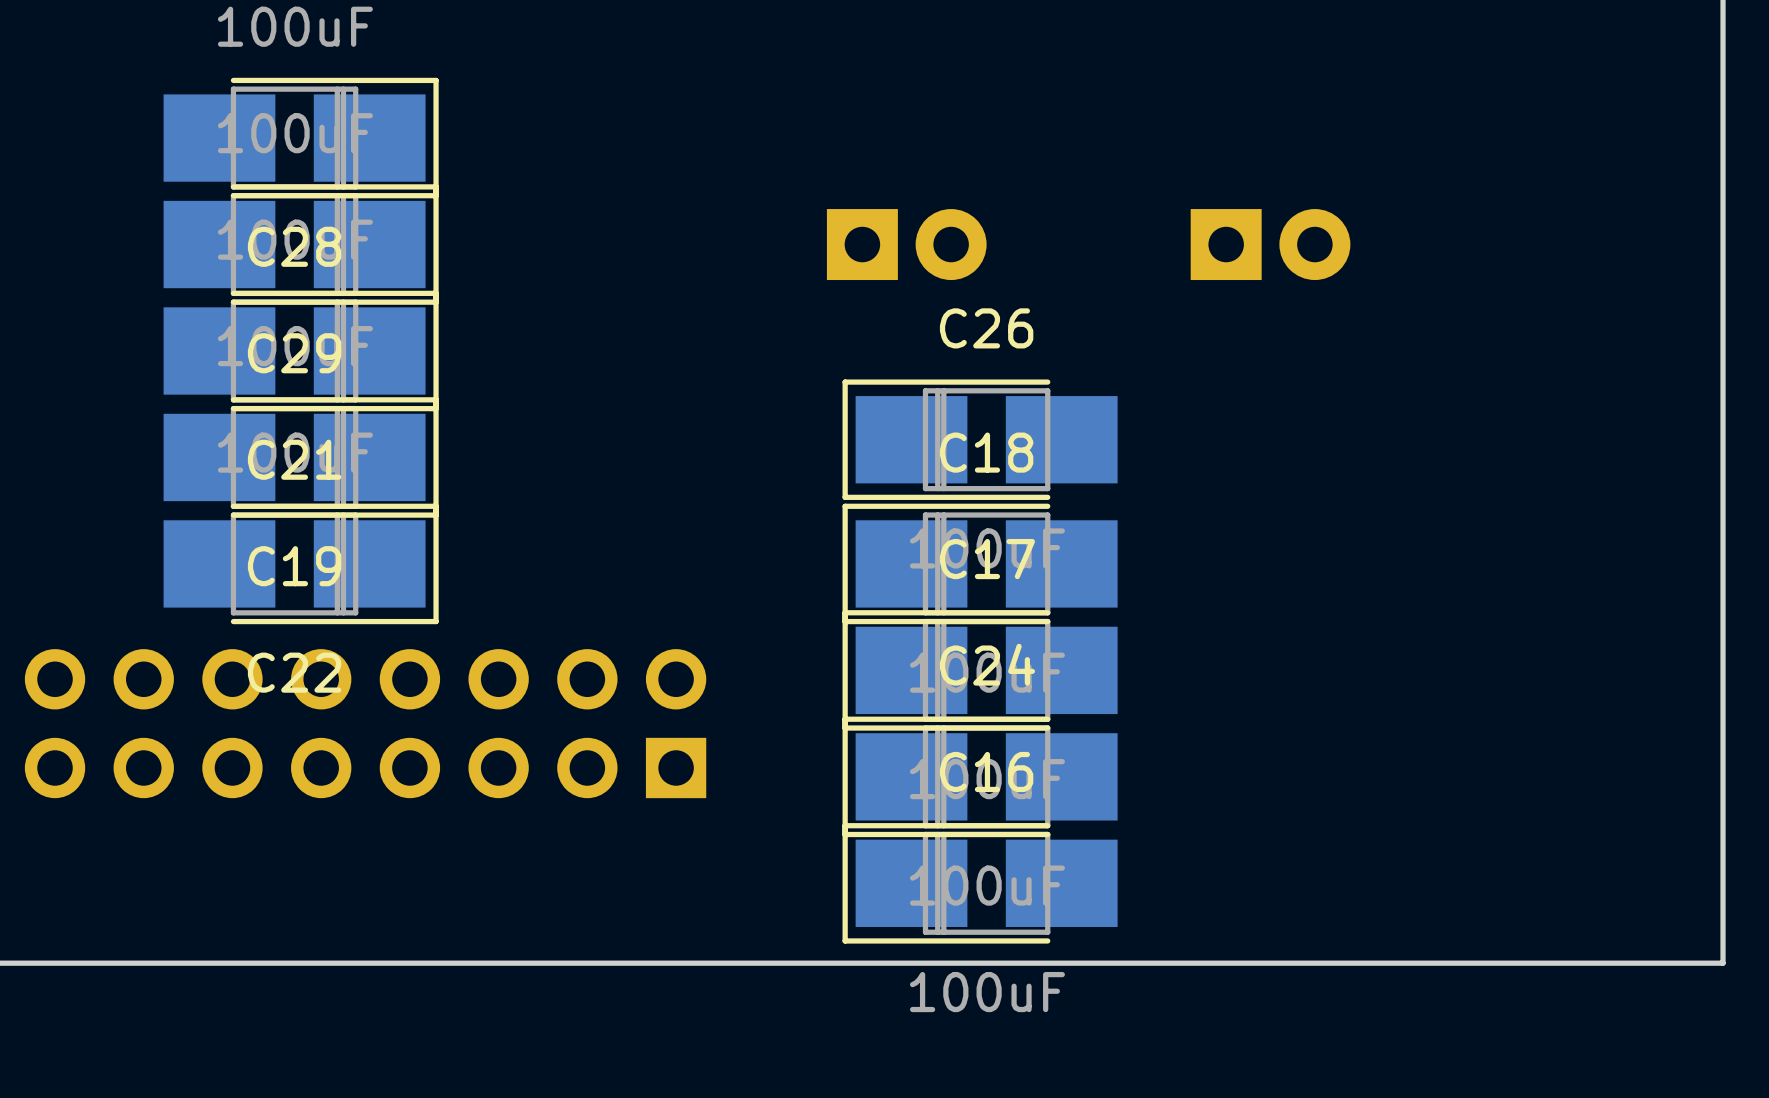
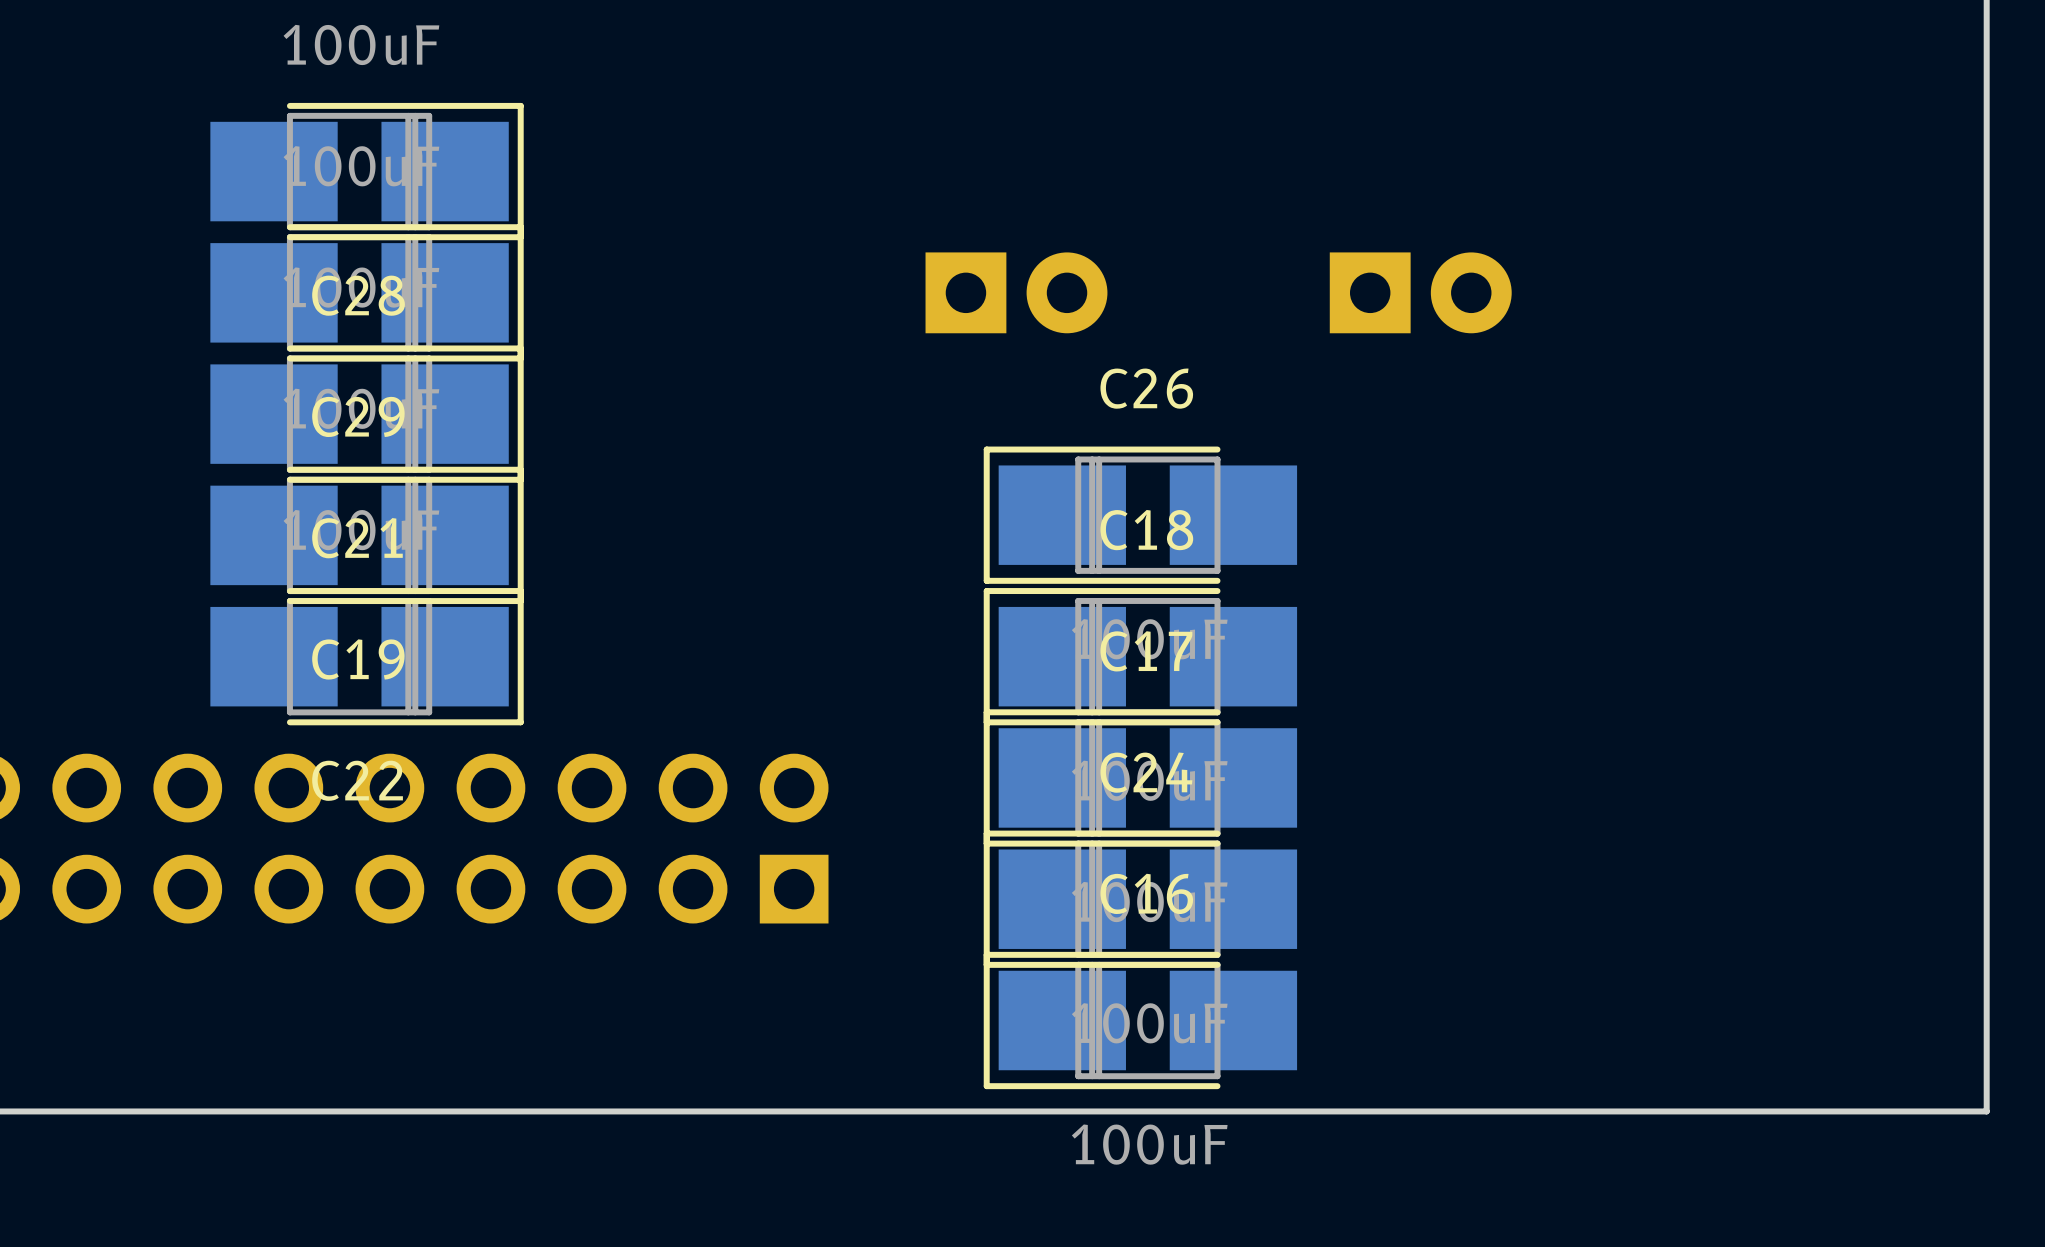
part position: (906, 244) -> (1016, 292)
part position: (1270, 244) -> (1420, 292)

